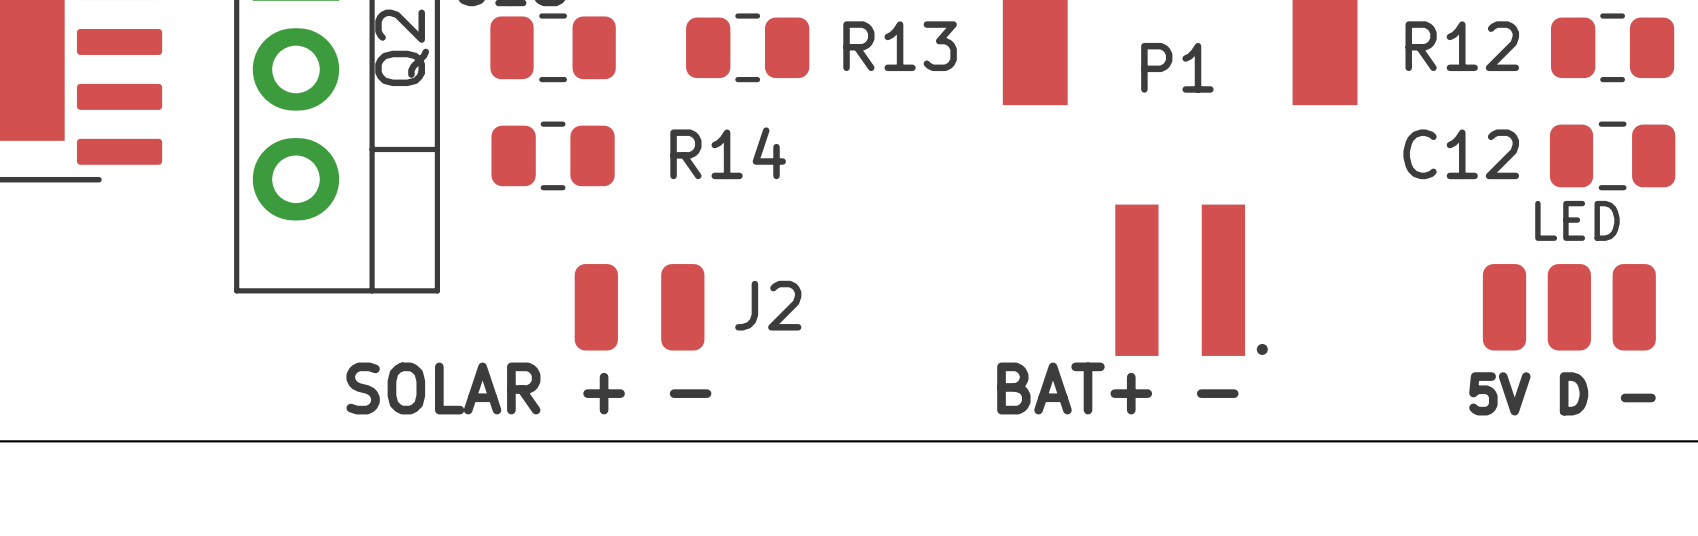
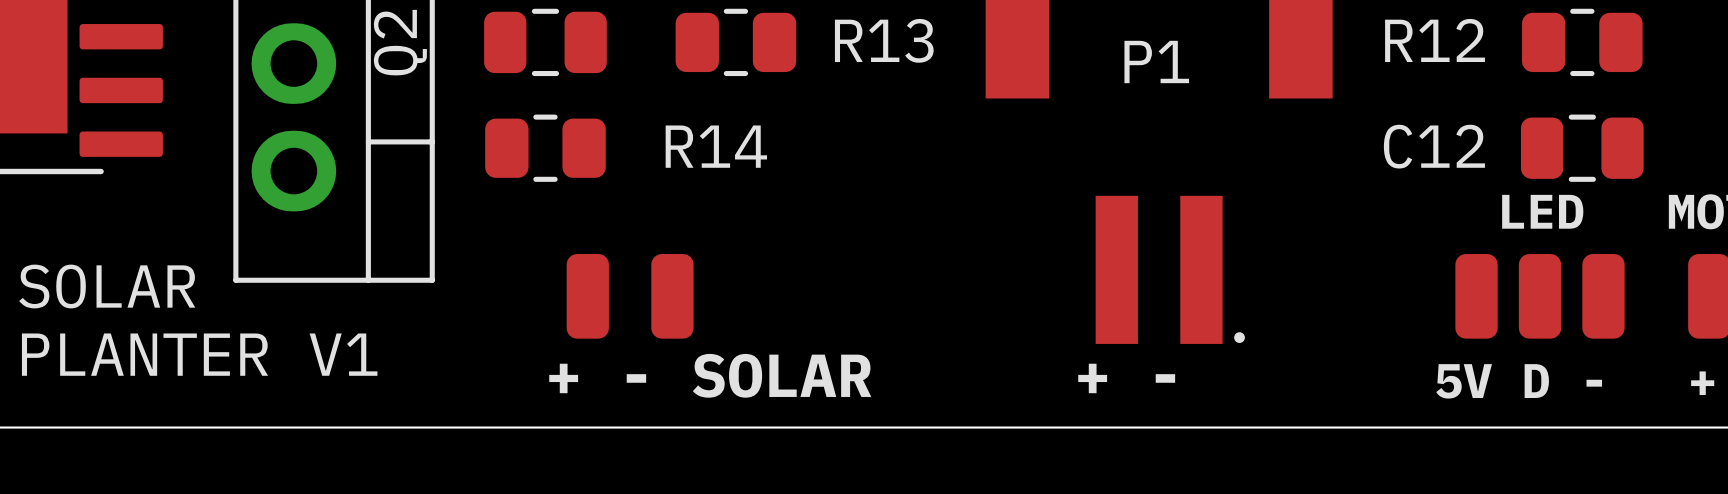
text: none -> SOLAR (107, 286)
J2 name: J2 (768, 305) -> none
text: none -> PLANTER V1 (199, 354)
text: SOLAR + - (528, 388) -> none
text: none -> + - SOLAR (710, 375)
text: BAT+ - (1117, 388) -> + - (1126, 378)

